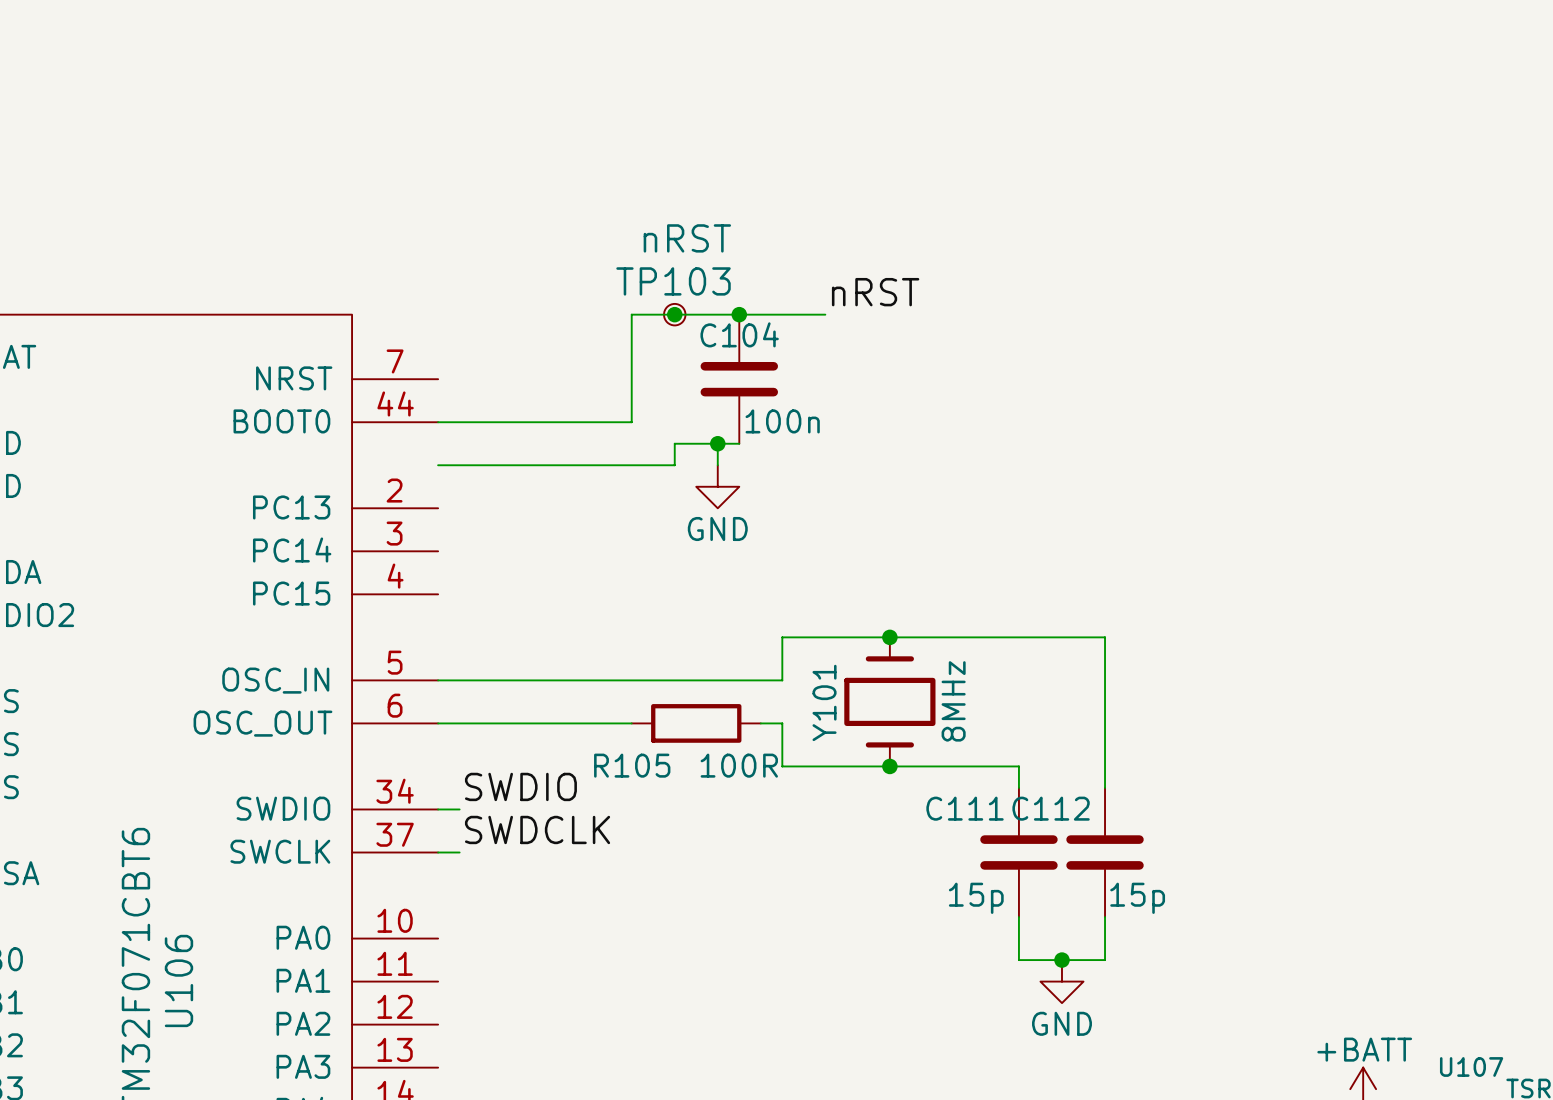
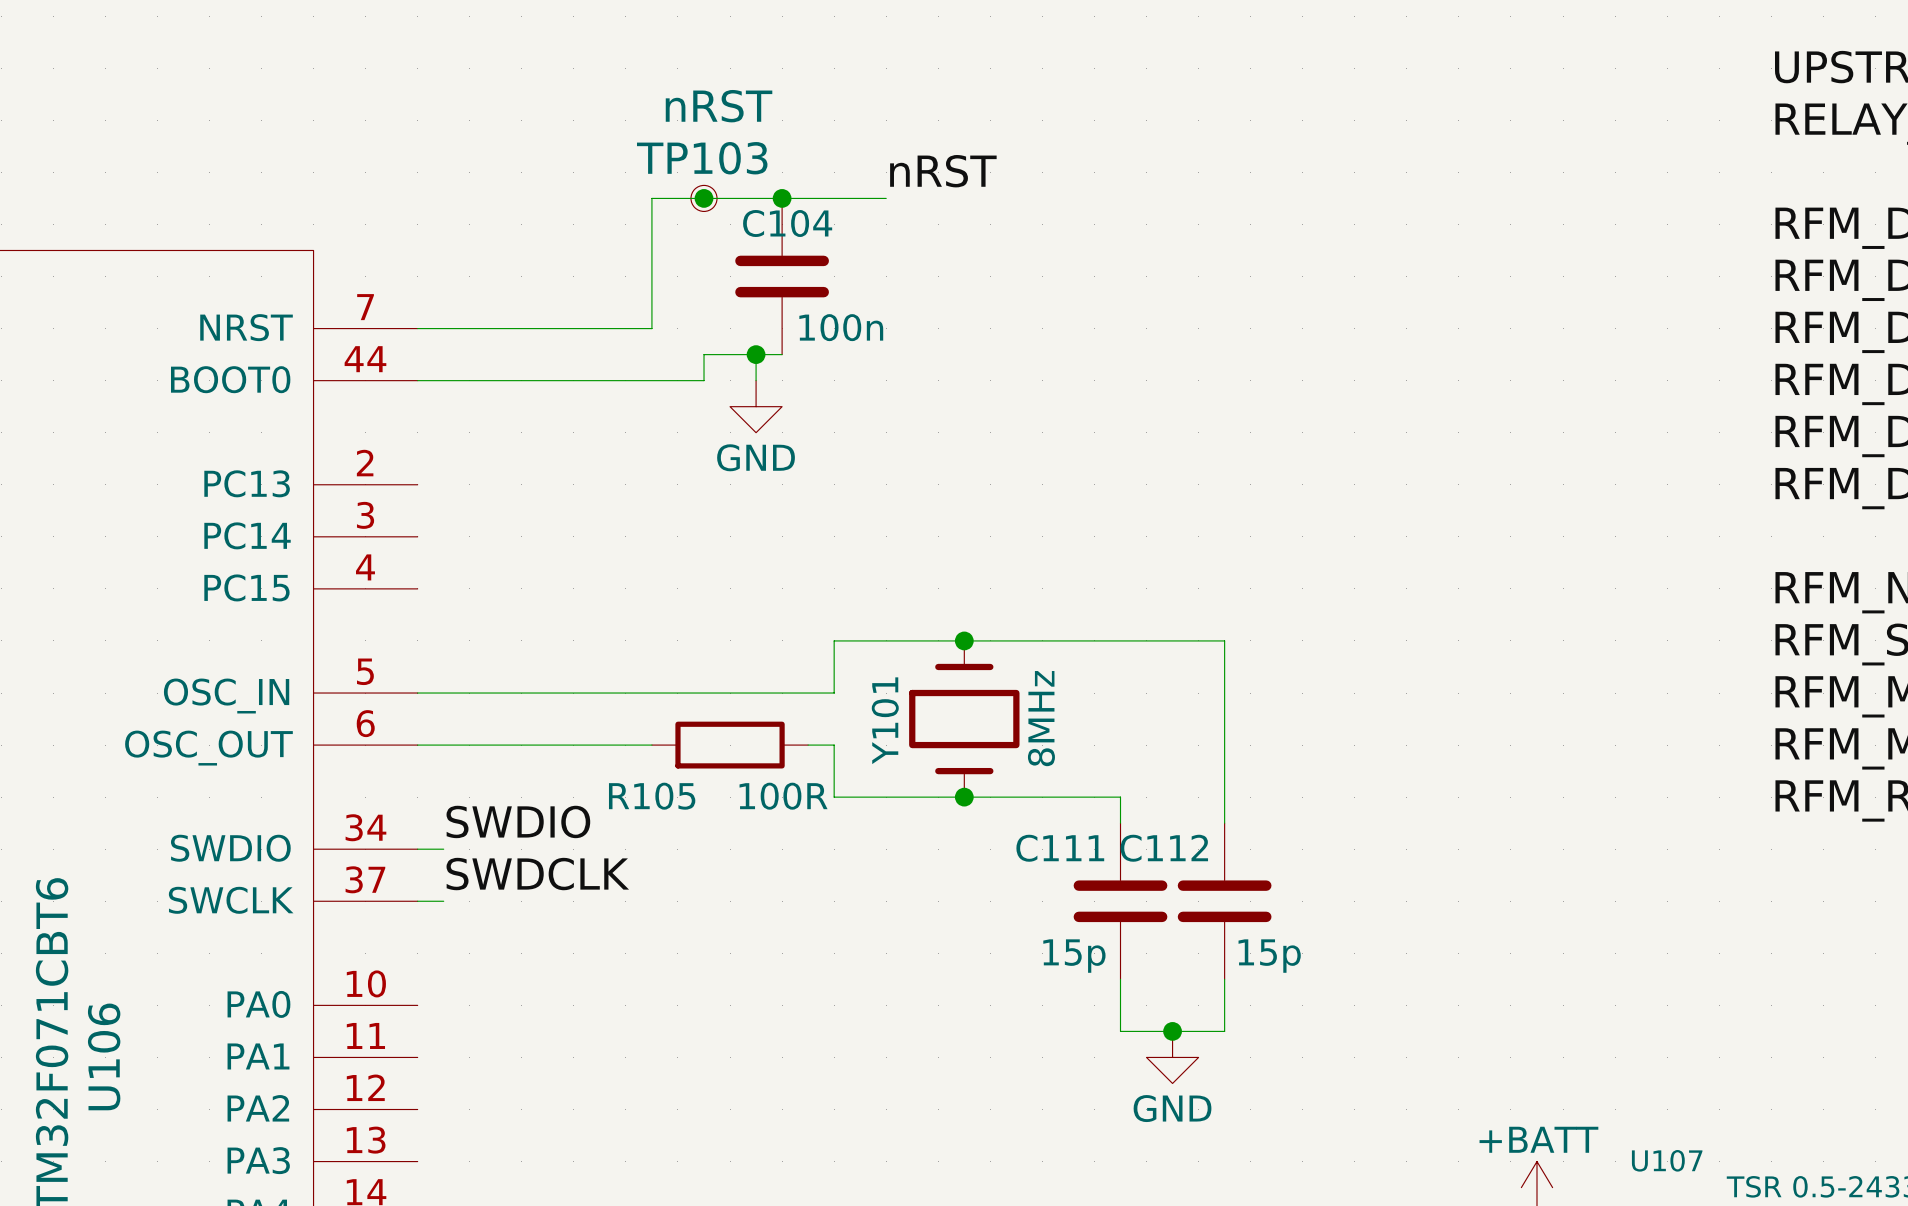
junction: none -> (704, 198)
junction: none -> (782, 198)
label position: nRST (875, 292) -> nRST (943, 171)
wire: (631, 314) (825, 314) -> (651, 250) (651, 198) (886, 198)
TP103 position: (674, 314) -> (704, 198)
junction: (674, 314) -> none
junction: (739, 314) -> none
wire: none -> (417, 328) (651, 328)
wire: (631, 379) (631, 422) -> (782, 354) (704, 354) (704, 380) (651, 380)
C104 position: (739, 379) -> (782, 276)
wire: (717, 443) (717, 465) -> (756, 354) (756, 380)
junction position: (717, 443) -> (756, 354)
wire: (739, 443) (674, 443) (674, 465) (438, 465) -> none
power symbol position: GND (717, 486) -> GND (756, 406)

